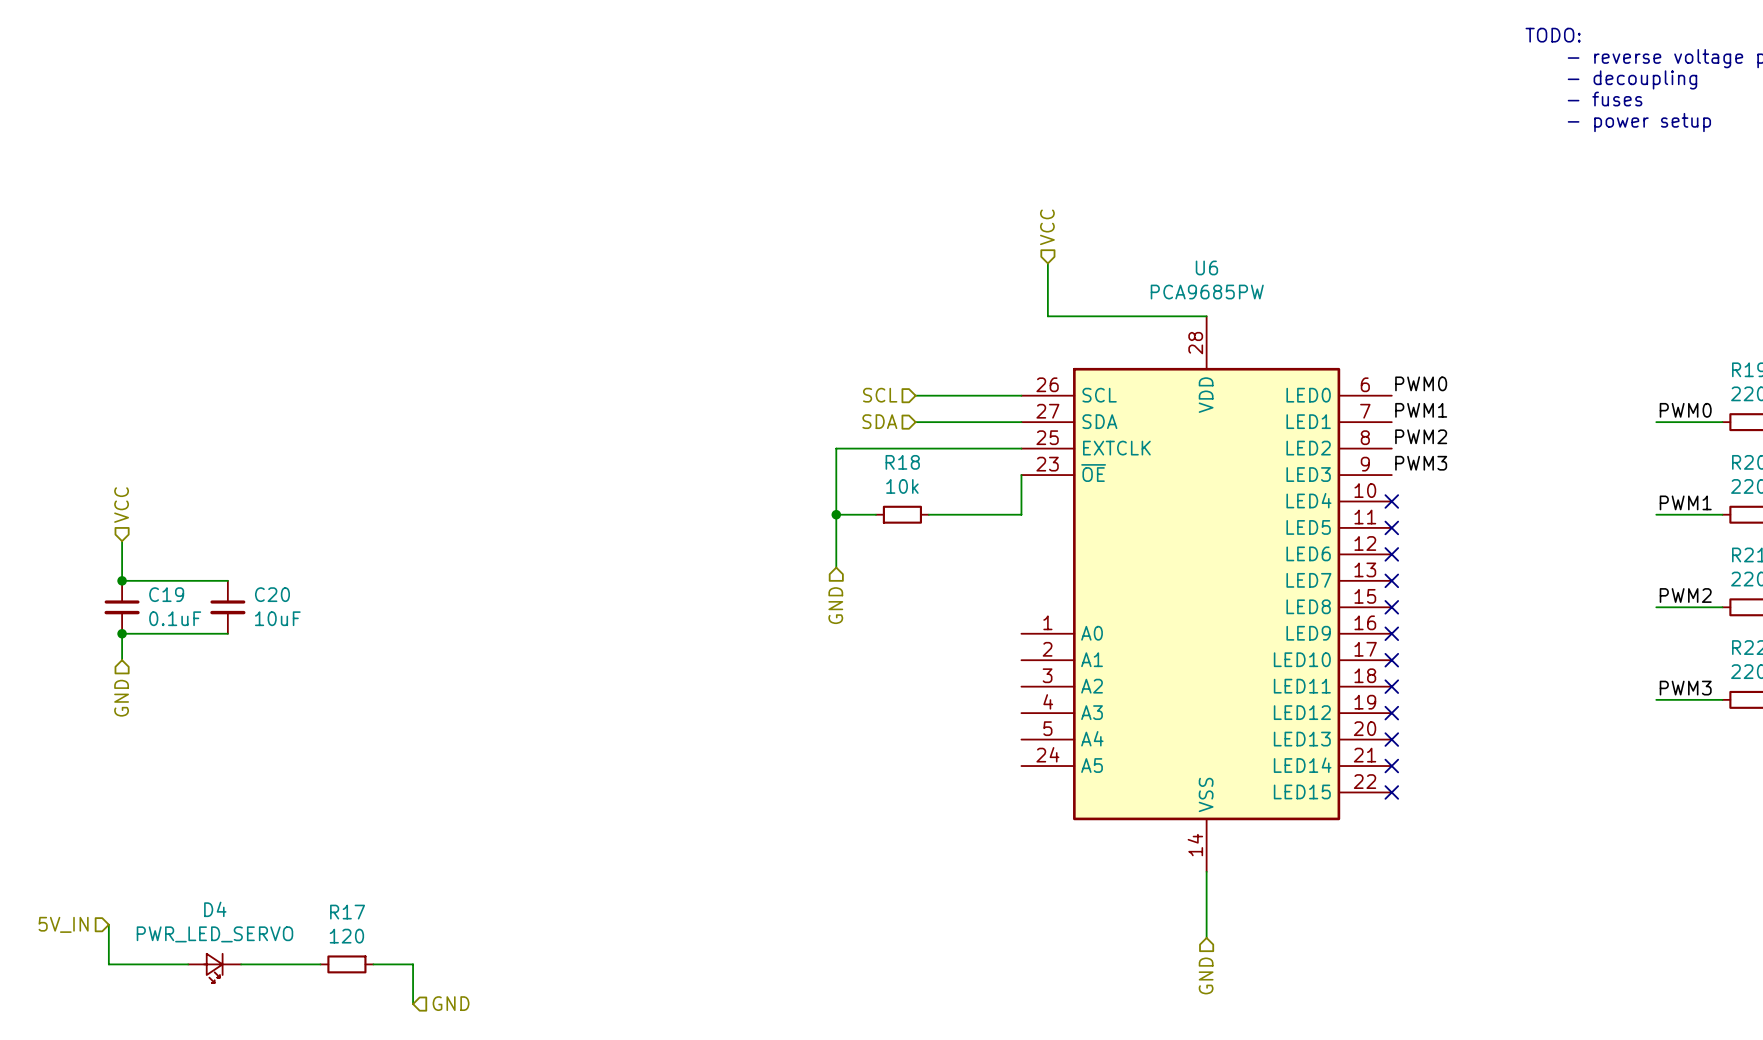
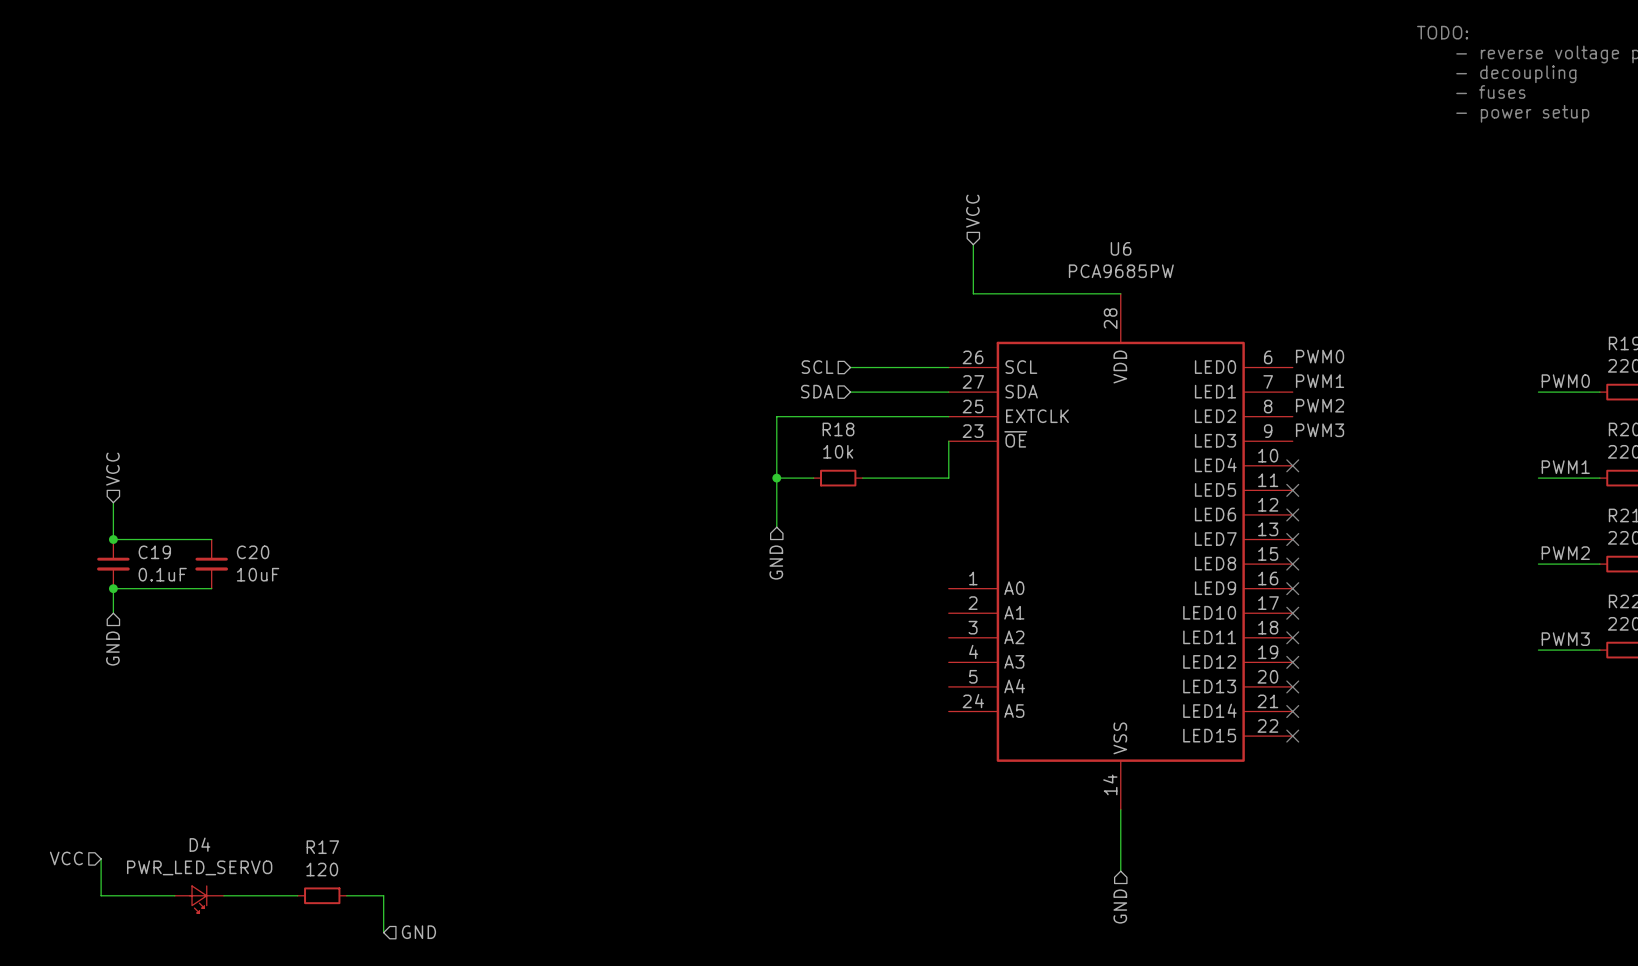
hierarchical label: 5V_IN (63, 924) -> VCC (66, 858)

